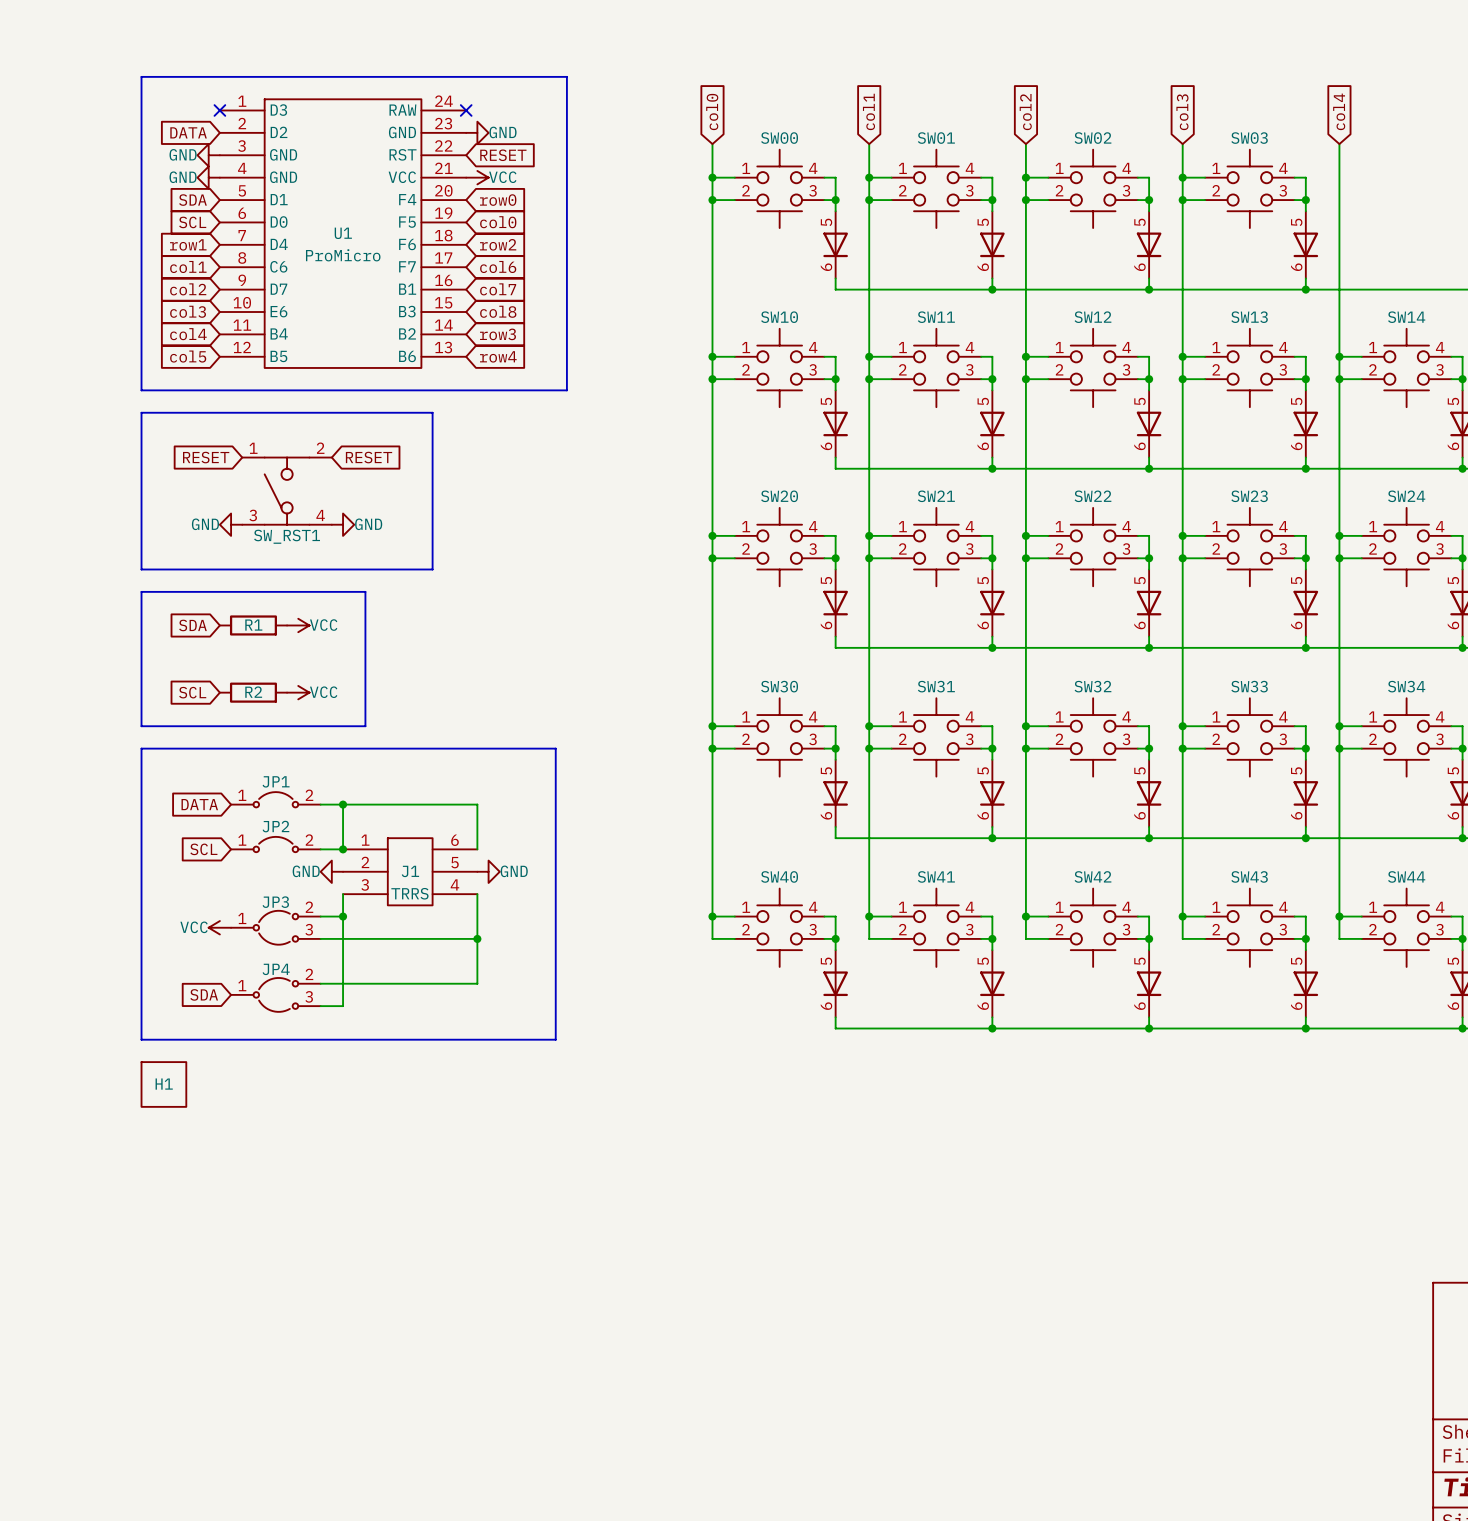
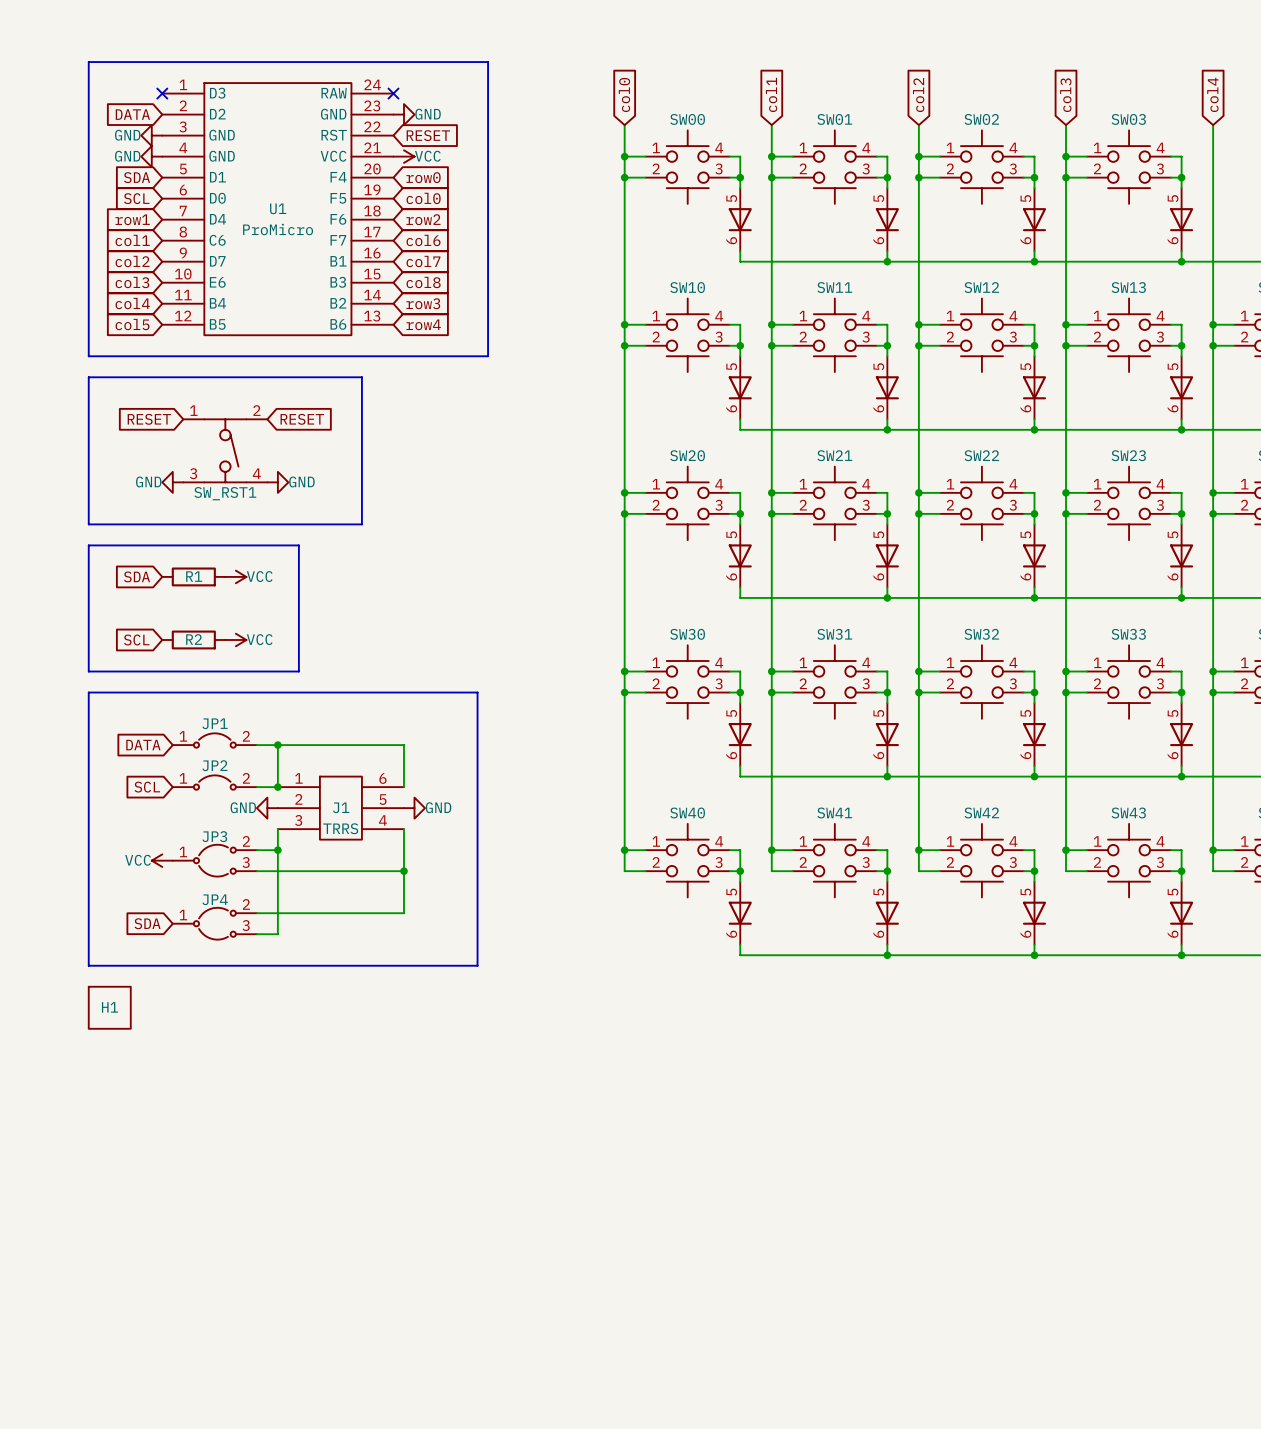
SW_RST1 symbol: [242, 457, 332, 525] -> [183, 419, 268, 483]

